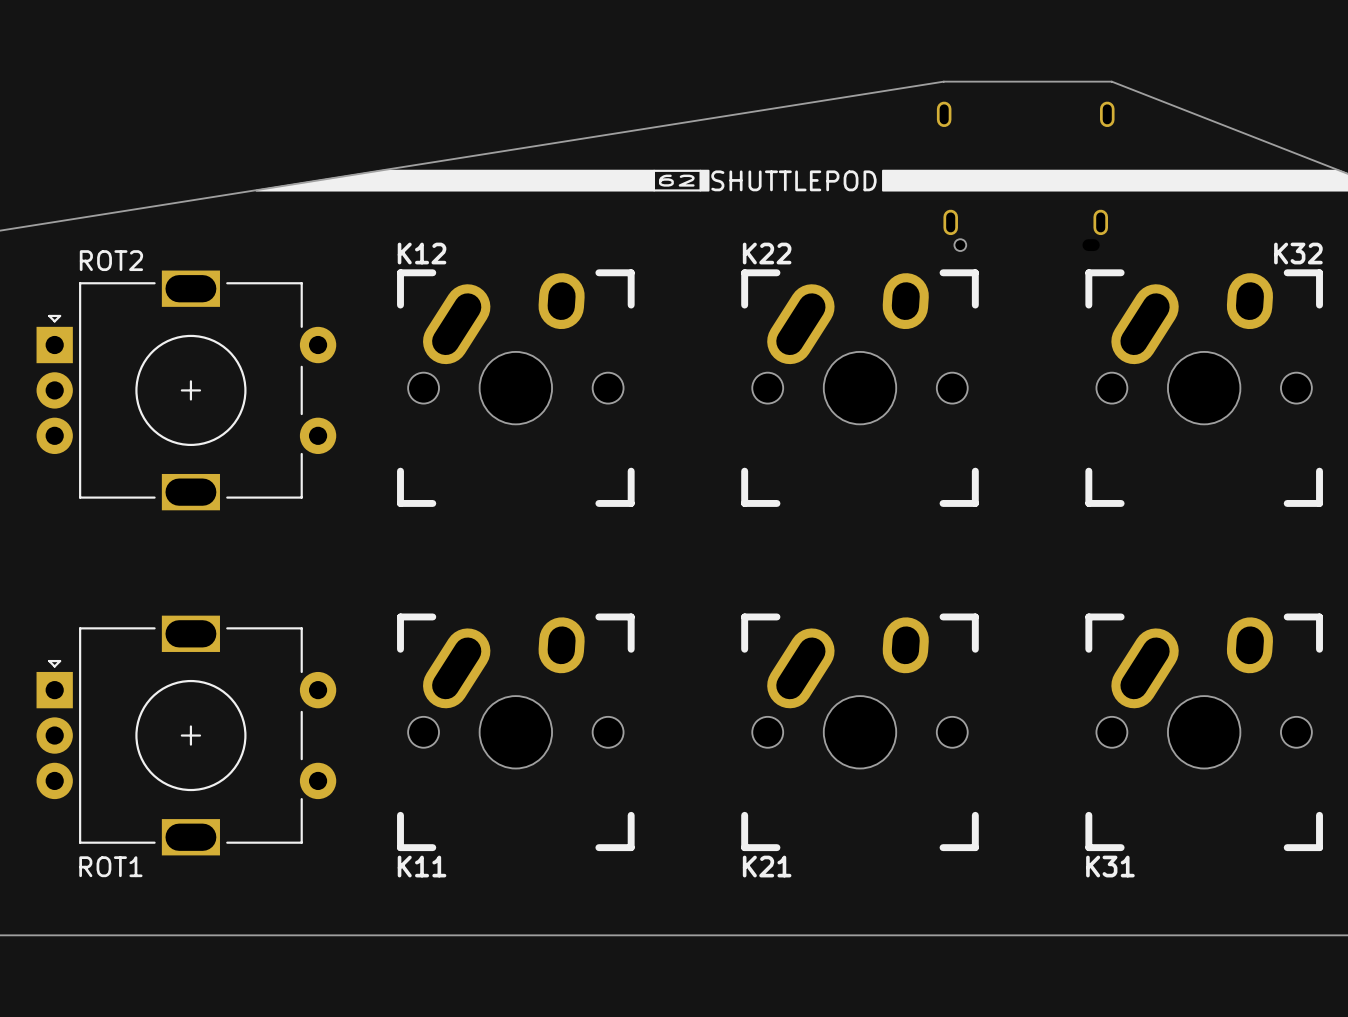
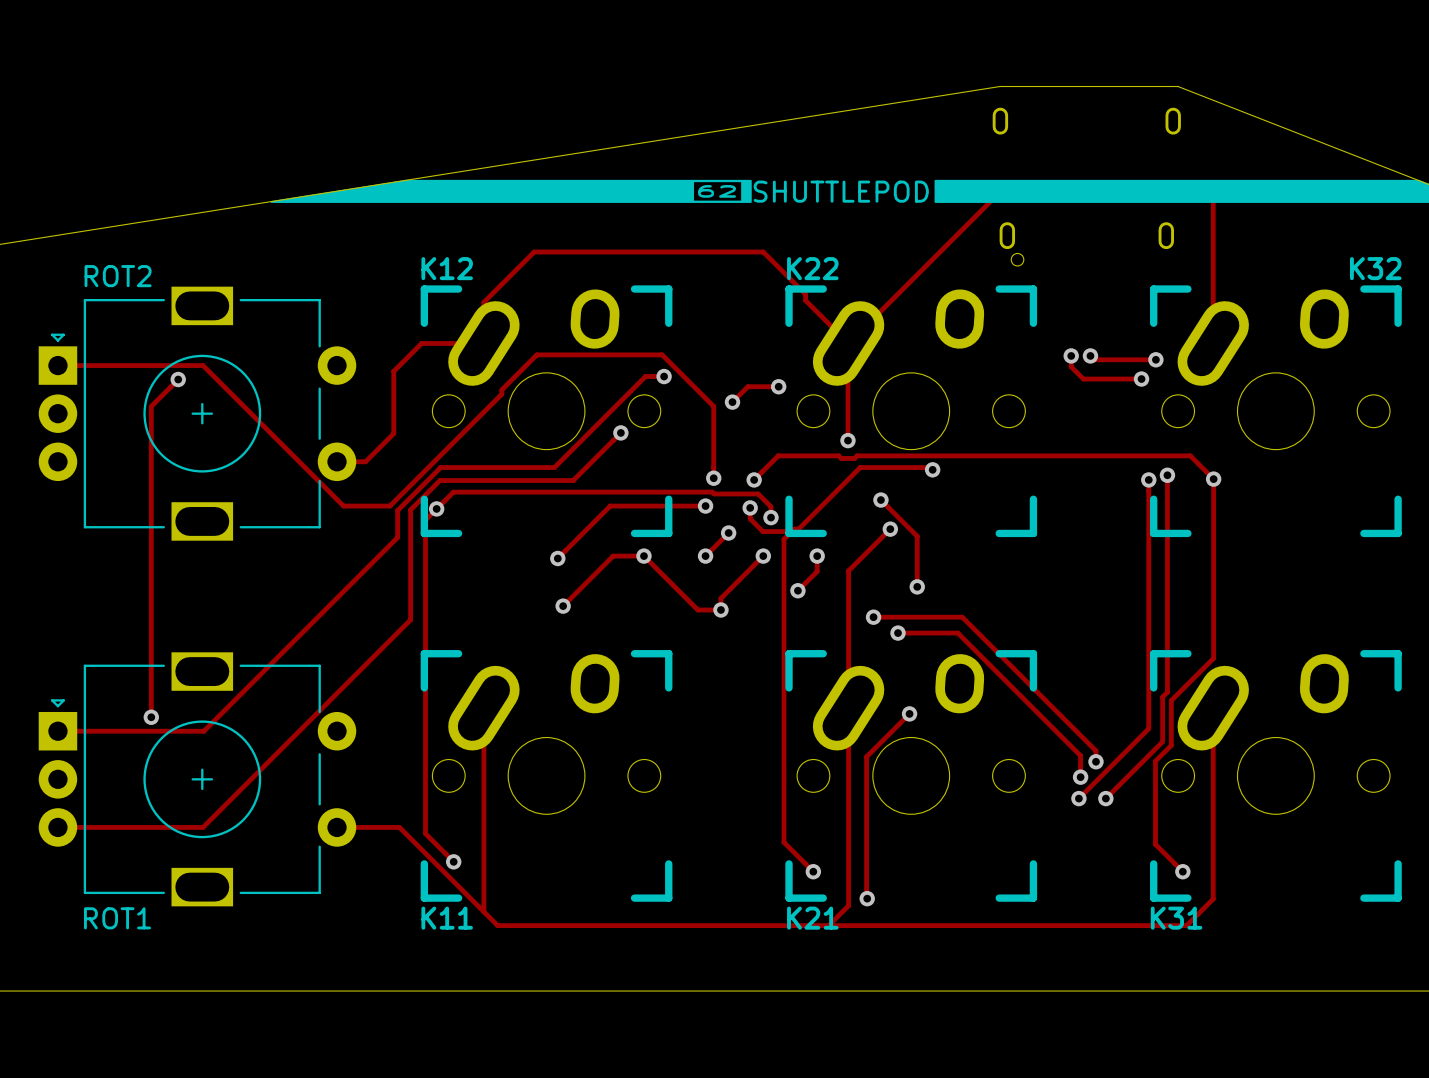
track: none -> (848, 343) (805, 300) (805, 294) (763, 252) (534, 252) (483, 302) (483, 343) (421, 343) (393, 371) (393, 433) (365, 461) (337, 461)
track: none -> (1213, 343) (1213, 190) (1001, 190) (847, 344) (847, 440)
track: none -> (1071, 355) (1071, 366) (1083, 379) (1141, 379)
via: none -> (1071, 355)
track: none -> (1090, 355) (1094, 359) (1155, 359)
via: none -> (1090, 355)
via: none -> (1155, 359)
track: none -> (57, 365) (203, 365) (343, 506) (389, 506) (501, 394) (501, 389) (536, 354) (662, 354) (713, 406) (713, 478)
track: none -> (664, 376) (645, 376) (554, 467) (440, 467) (397, 510) (397, 537) (203, 731) (57, 731)
via: none -> (664, 376)
via: none -> (1141, 379)
track: none -> (178, 379) (151, 406) (151, 717)
via: none -> (178, 379)
track: none -> (778, 386) (747, 386) (732, 402)
via: none -> (778, 386)
via: none -> (732, 402)
track: none -> (620, 432) (573, 480) (439, 480) (410, 509) (410, 619) (203, 827) (57, 827)
via: none -> (620, 432)
via: none -> (847, 440)
track: none -> (924, 467) (860, 467) (798, 529) (794, 529) (783, 539) (783, 842) (813, 871)
via: none -> (932, 469)
track: none -> (1167, 475) (1167, 692) (1162, 697) (1162, 741) (1105, 798)
via: none -> (1167, 475)
via: none -> (713, 478)
track: none -> (754, 479) (778, 455) (838, 455) (841, 458) (854, 458) (857, 455) (1190, 455) (1213, 479) (1213, 658) (1171, 700) (1171, 745) (1155, 761) (1155, 844) (1182, 871)
via: none -> (754, 479)
track: none -> (1148, 479) (1148, 728) (1078, 798)
via: none -> (1148, 479)
via: none -> (1213, 479)
track: none -> (880, 500) (917, 536) (917, 586)
via: none -> (880, 500)
track: none -> (705, 506) (610, 506) (557, 558)
via: none -> (705, 506)
track: none -> (750, 507) (750, 518) (762, 531) (791, 531)
via: none -> (750, 507)
via: none -> (436, 508)
track: none -> (770, 517) (770, 506) (758, 493) (714, 493) (712, 492) (453, 492) (425, 520) (425, 833) (453, 861)
via: none -> (770, 517)
track: none -> (890, 529) (848, 570) (848, 905) (828, 925)
via: none -> (890, 529)
track: none -> (728, 532) (705, 556)
via: none -> (728, 532)
via: none -> (643, 556)
via: none -> (705, 556)
track: none -> (763, 556) (720, 598) (720, 609) (697, 609) (643, 556) (613, 556) (563, 606)
via: none -> (763, 556)
track: none -> (817, 556) (817, 571) (797, 590)
via: none -> (817, 556)
via: none -> (557, 558)
via: none -> (917, 586)
via: none -> (797, 590)
via: none -> (563, 606)
via: none -> (720, 609)
track: none -> (873, 617) (962, 617) (1095, 750) (1095, 761)
via: none -> (873, 617)
track: none -> (898, 633) (957, 633) (1080, 755) (1080, 777)
via: none -> (898, 633)
track: none -> (483, 708) (483, 911)
track: none -> (1213, 708) (1213, 899) (1186, 925) (497, 925) (399, 827) (337, 827)
track: none -> (909, 713) (866, 756) (867, 898)
via: none -> (909, 713)
via: none -> (151, 717)
via: none -> (1095, 761)
via: none -> (1080, 777)
via: none -> (1078, 798)
via: none -> (1105, 798)
via: none -> (453, 861)
via: none -> (813, 871)
via: none -> (1182, 871)
via: none -> (867, 898)

